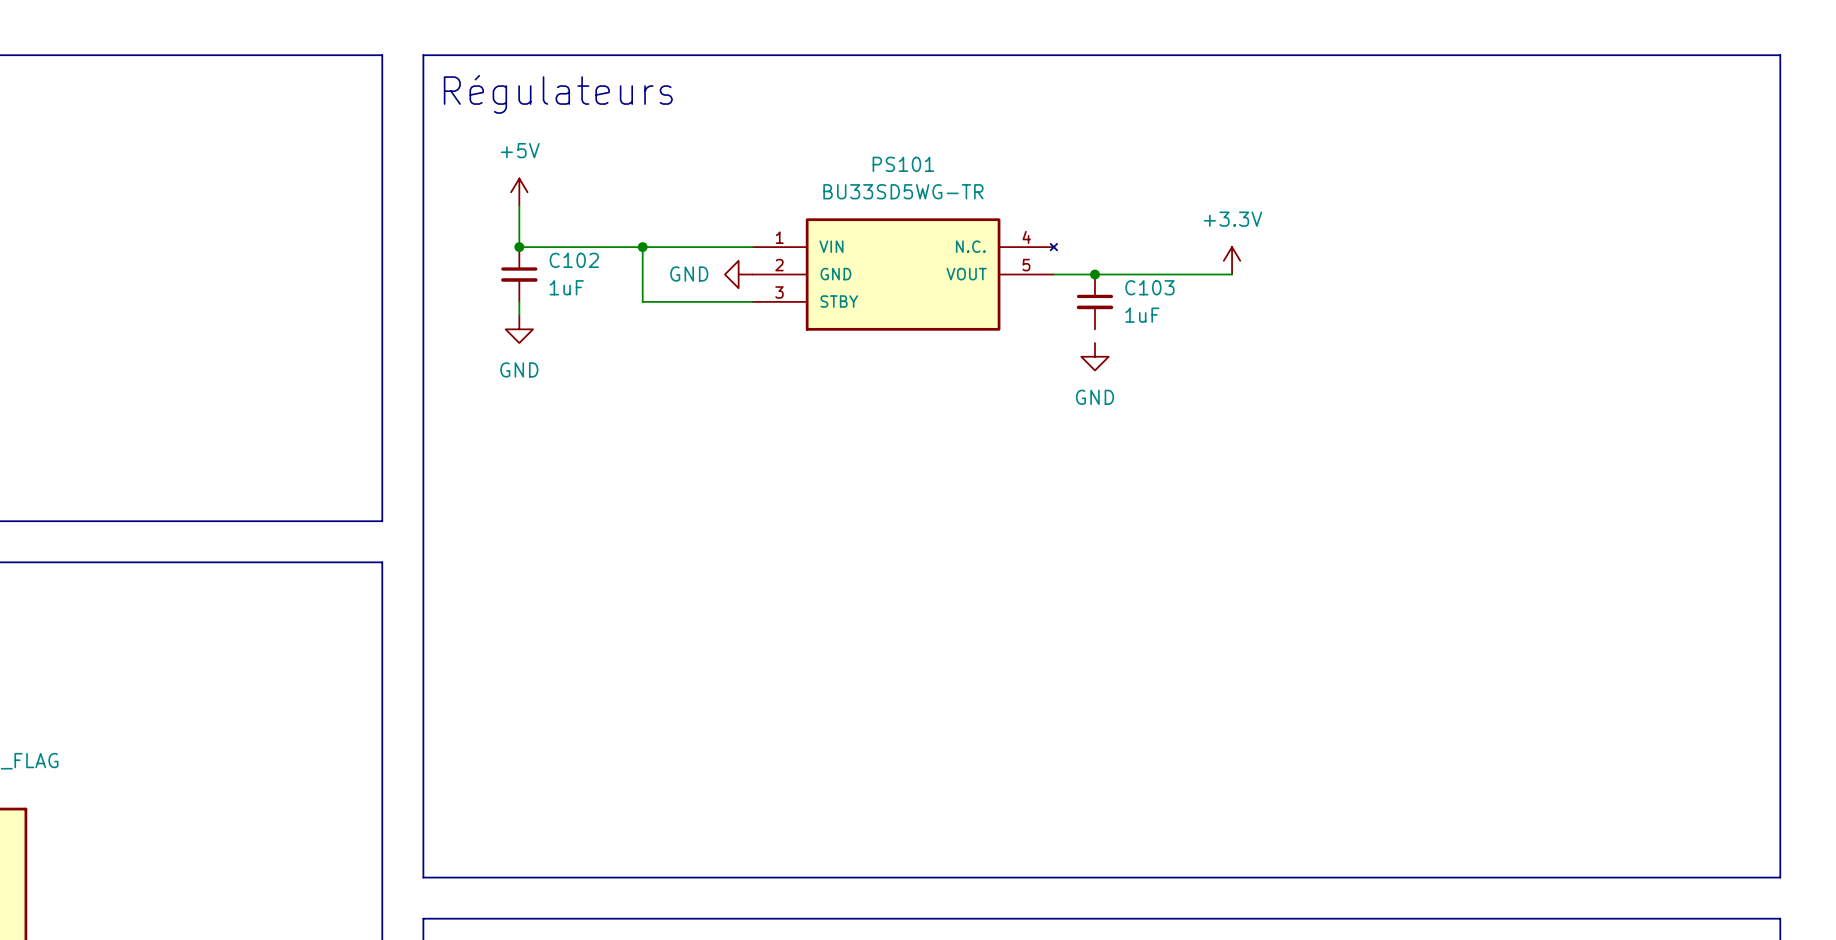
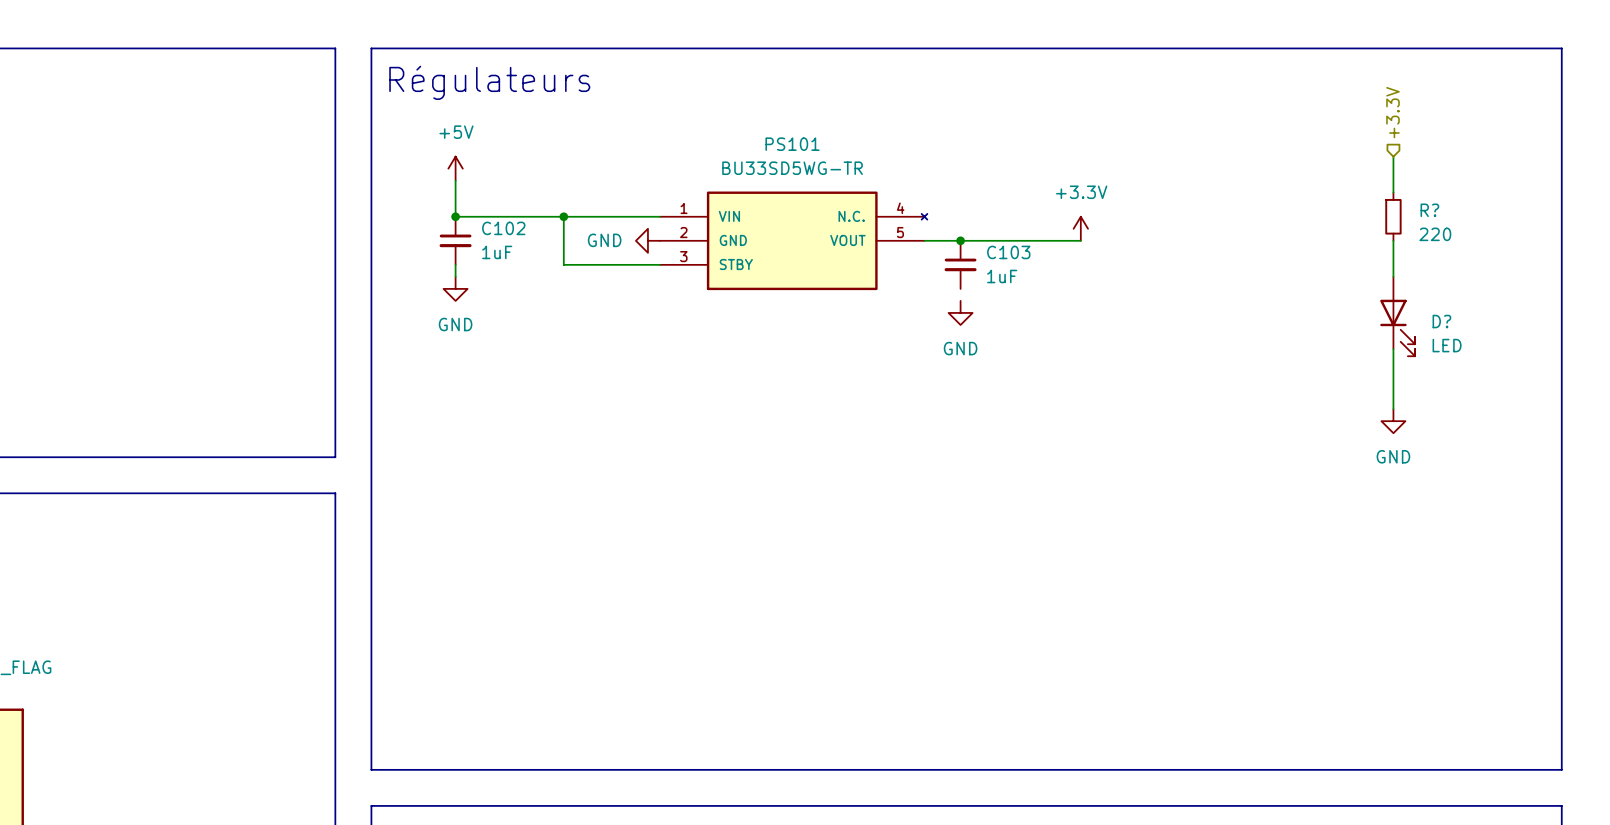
hierarchical label: none -> +3.3V (1392, 112)
wire: none -> (1393, 156) (1393, 192)
R?: none -> 220 (1393, 216)
wire: none -> (1393, 240) (1393, 276)
D?: none -> LED (1397, 316)
wire: none -> (1393, 349) (1393, 409)
power symbol: none -> GND (1393, 421)

